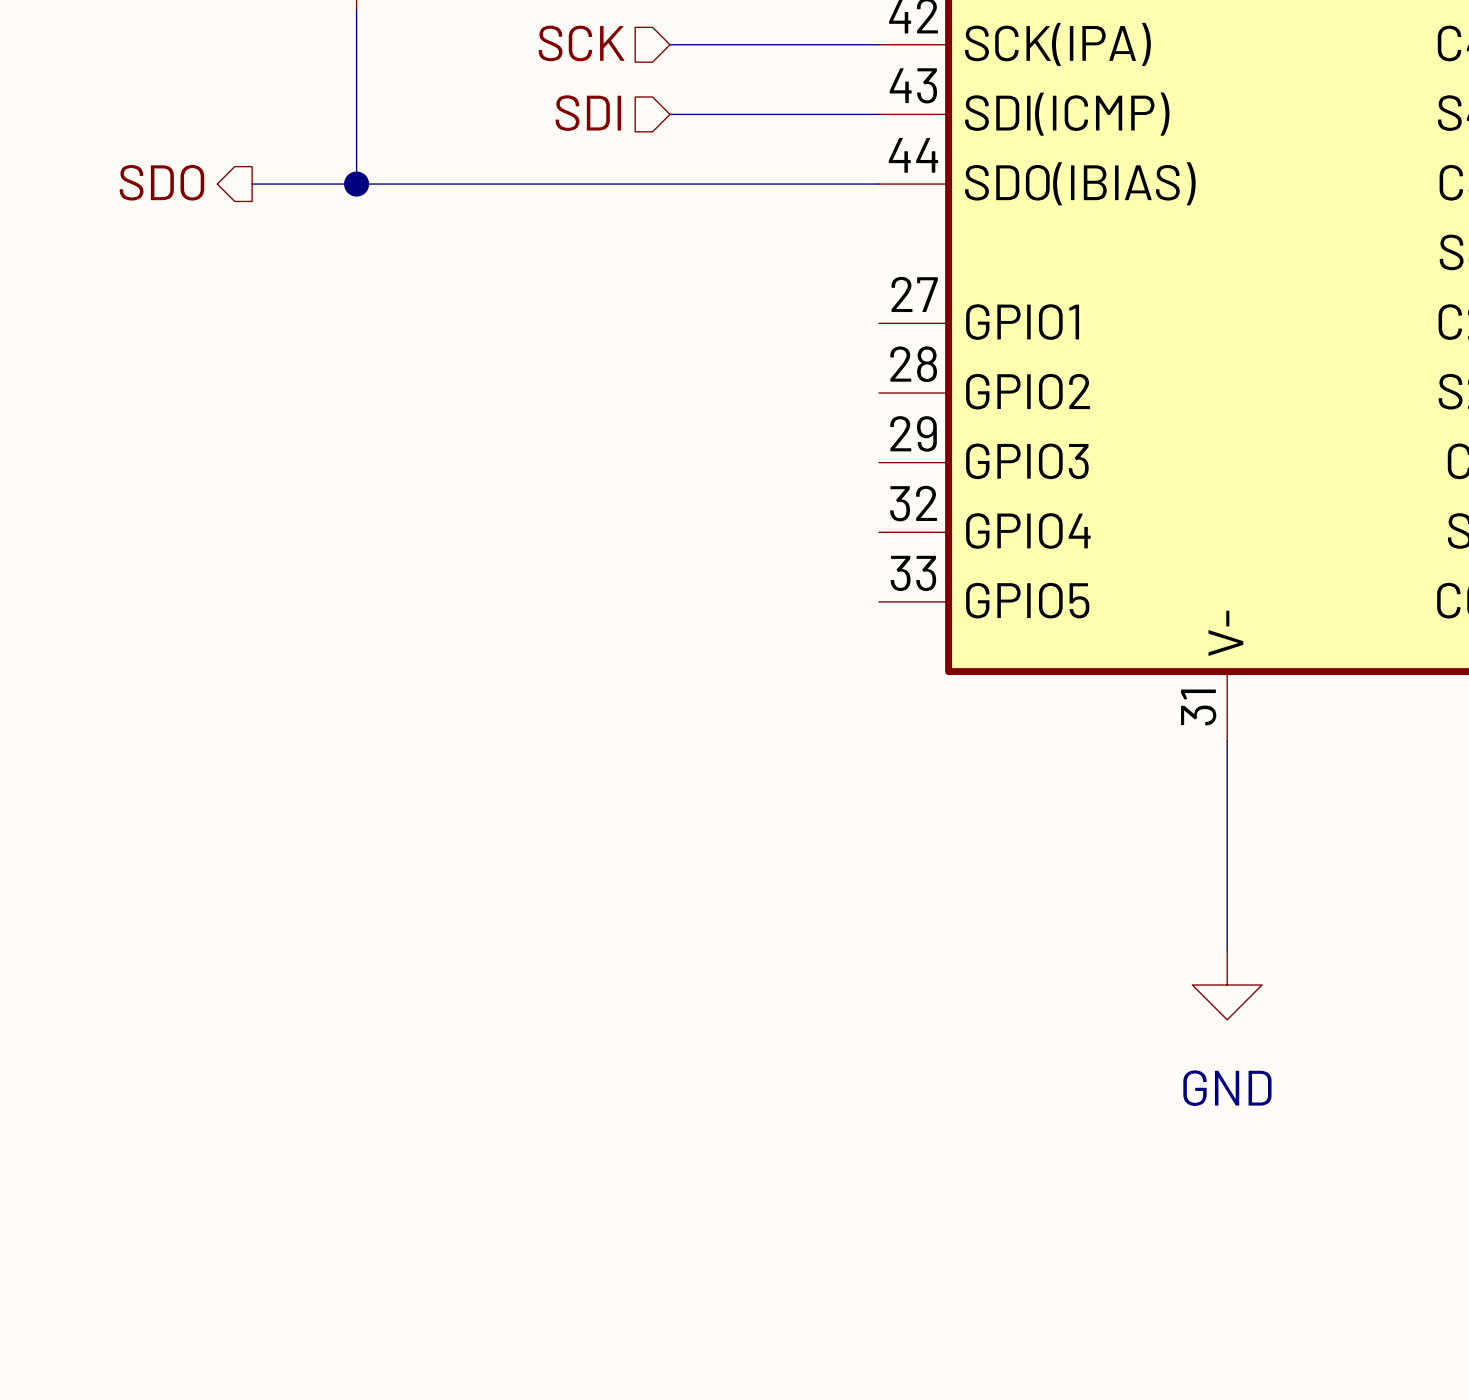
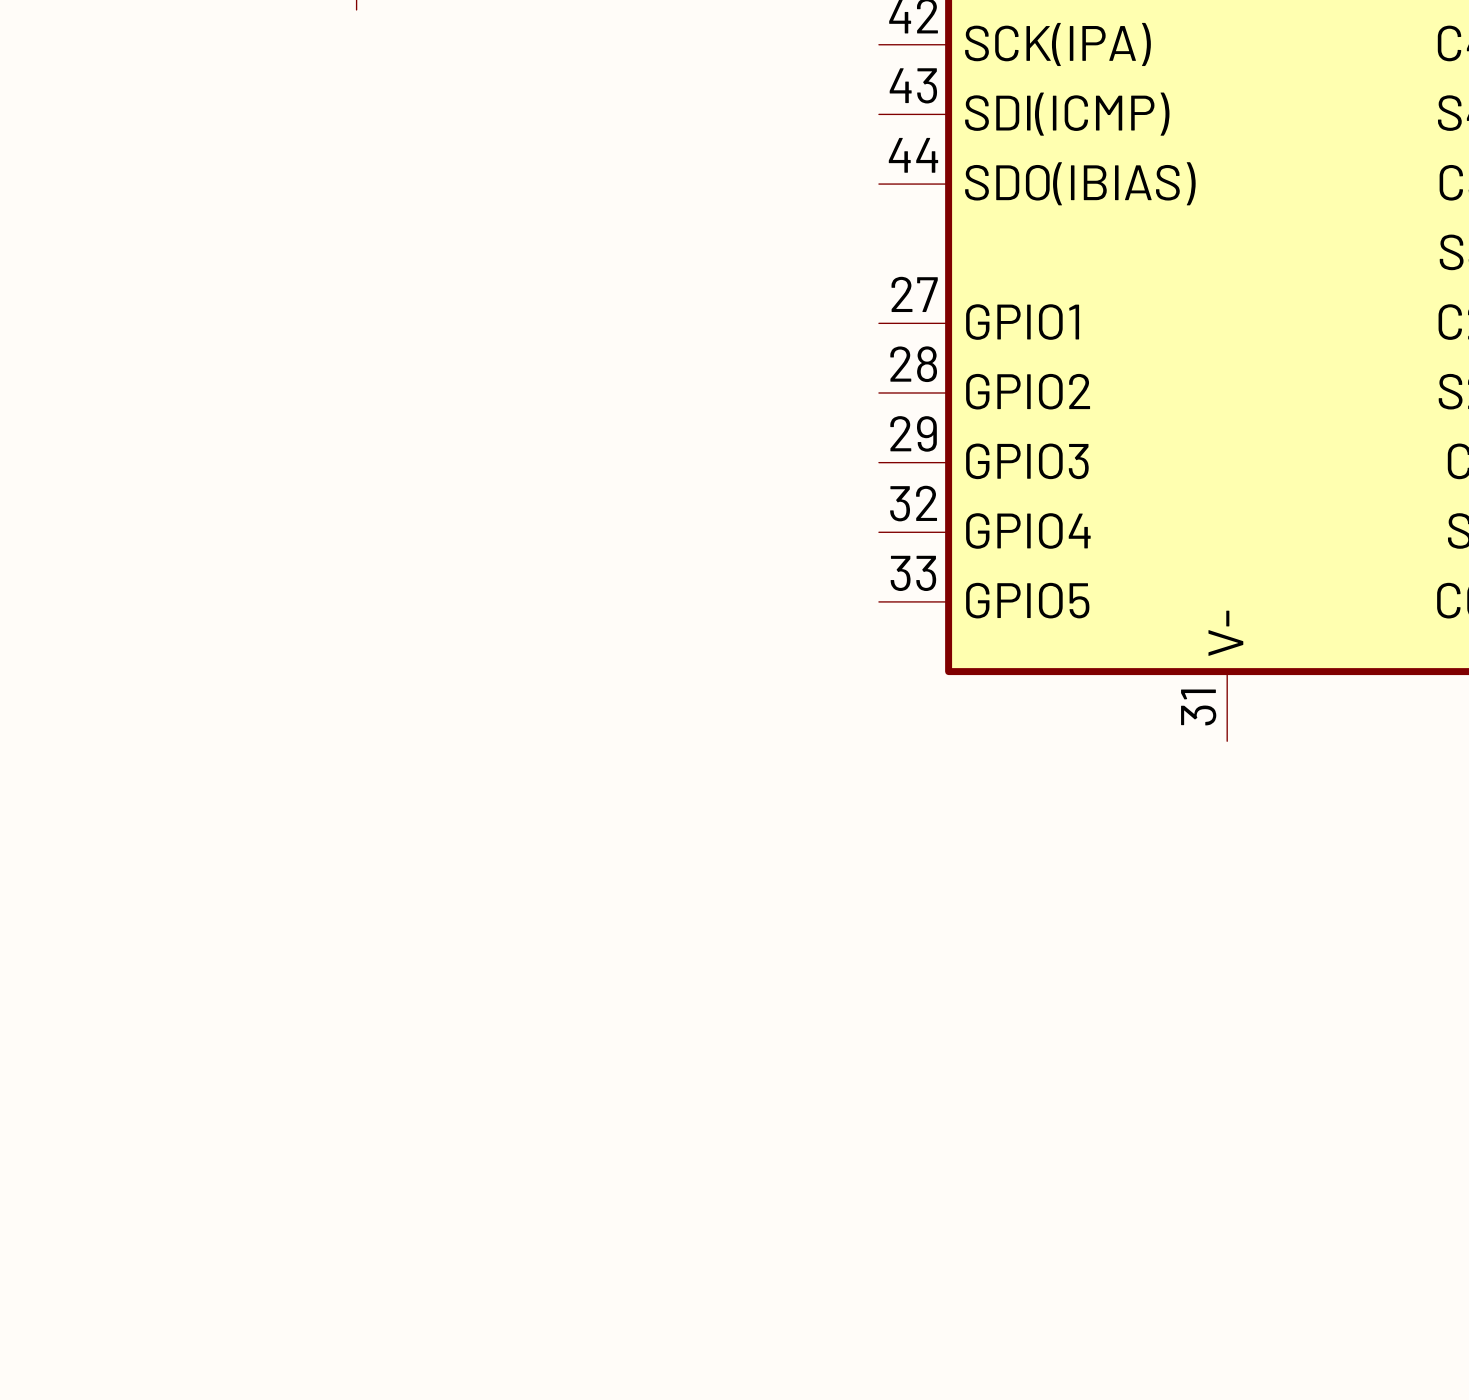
wire: (356, 9) (356, 184) -> none
hierarchical label: SCK (581, 43) -> none
wire: (670, 44) (878, 44) -> none
hierarchical label: SDI (588, 113) -> none
wire: (670, 114) (878, 114) -> none
hierarchical label: SDO (161, 182) -> none
wire: (252, 184) (878, 184) -> none
junction: (356, 184) -> none
wire: (1227, 741) (1227, 950) -> none
power symbol: GND (1227, 985) -> none

